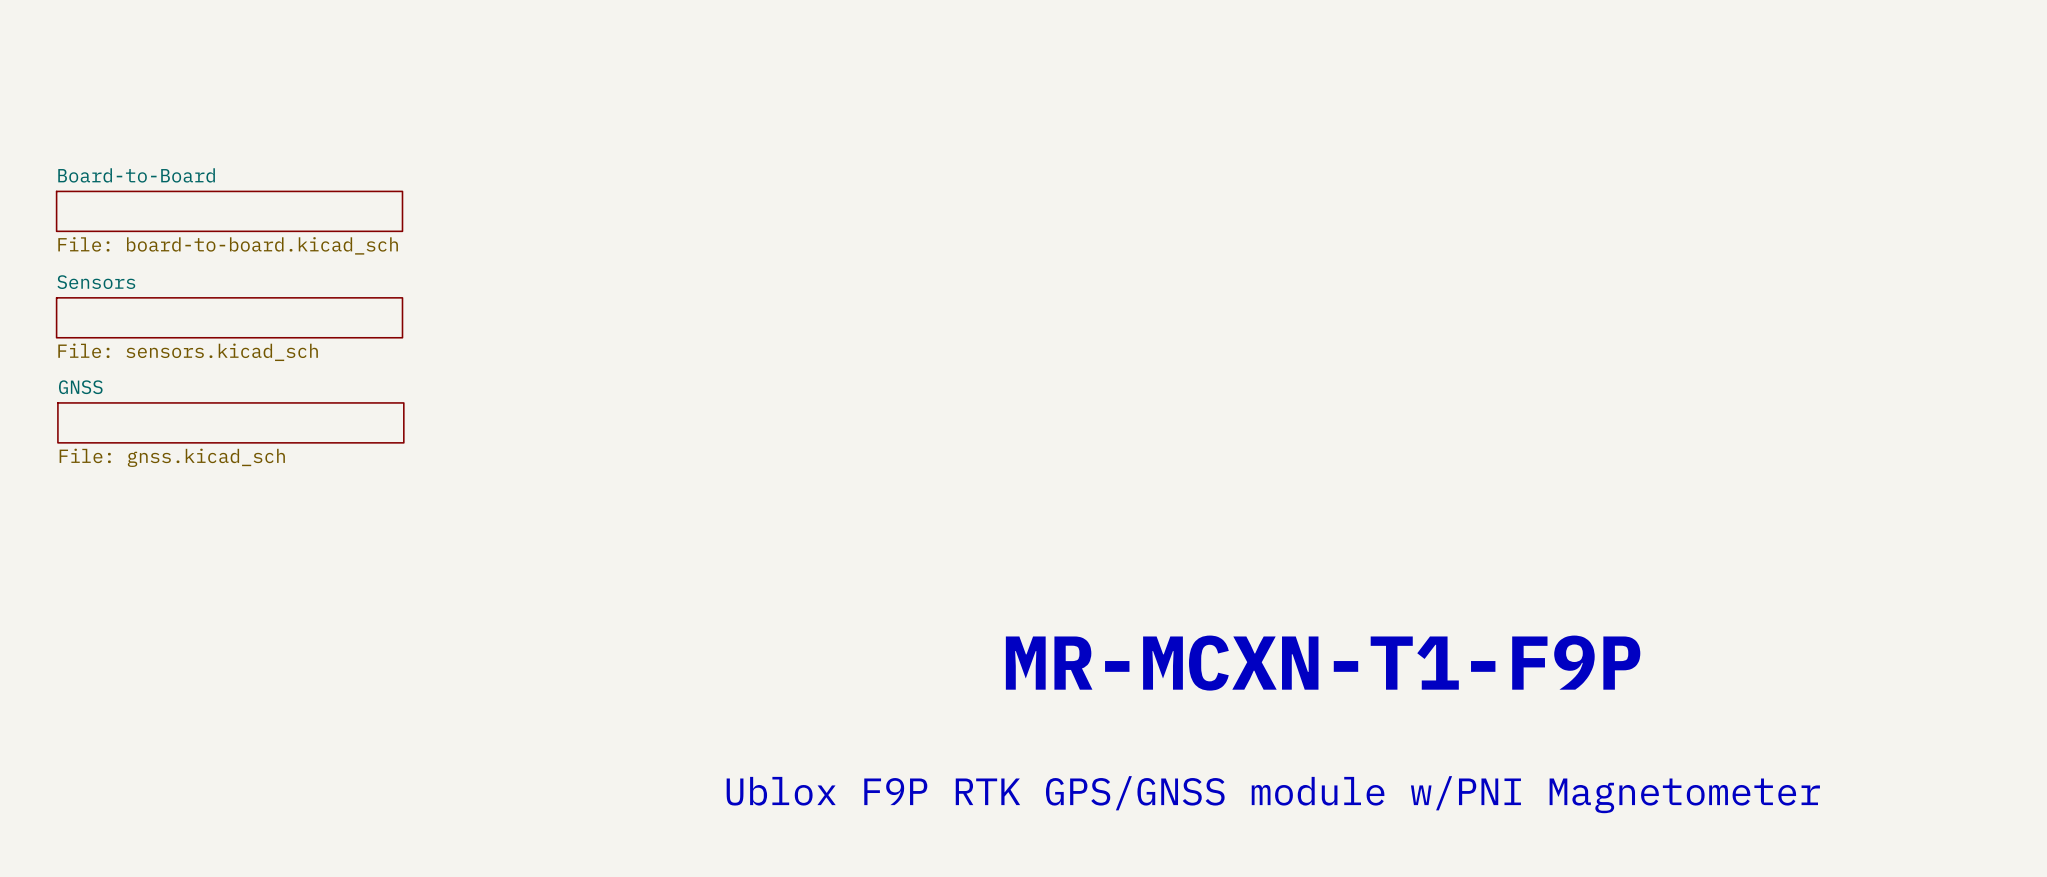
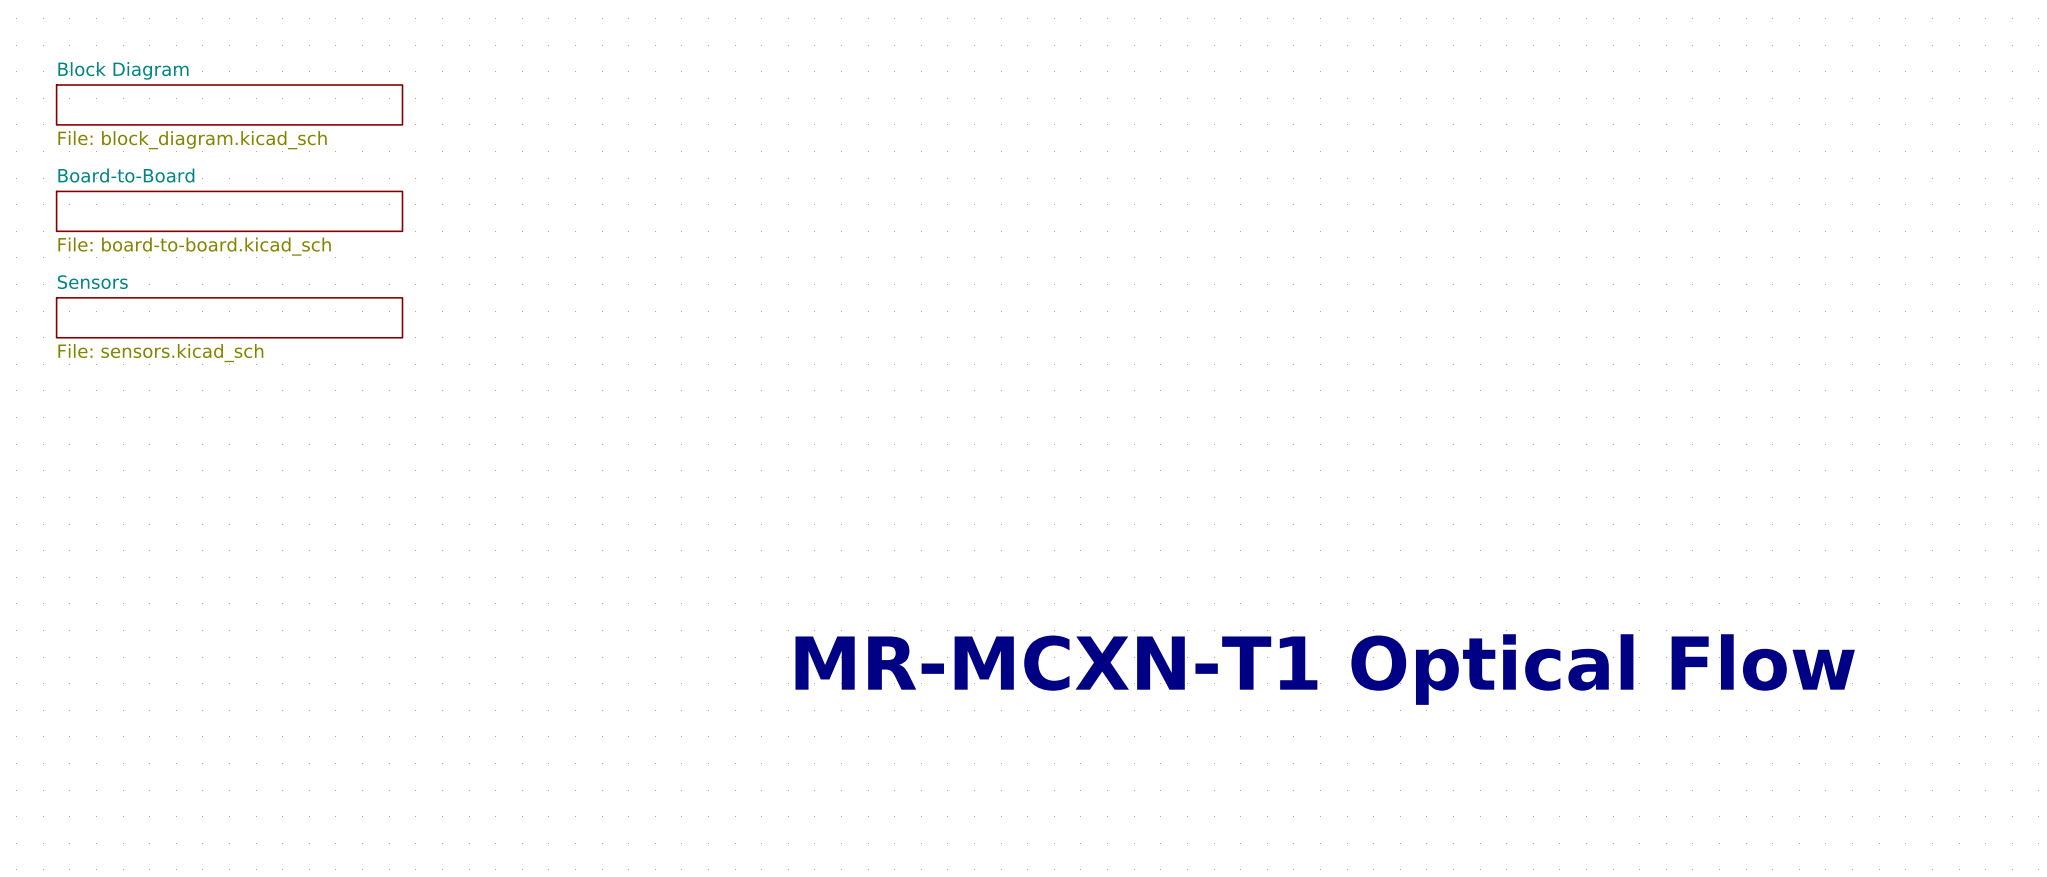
sheet Block Diagram: none -> File: block_diagram.kicad_sch (229, 104)
sheet GNSS: File: gnss.kicad_sch (230, 422) -> none
text: MR-MCXN-T1-F9P (1323, 663) -> MR-MCXN-T1 Optical Flow (1325, 669)
text: Ublox F9P RTK GPS/GNSS module w/PNI Magnetometer (1273, 794) -> none

